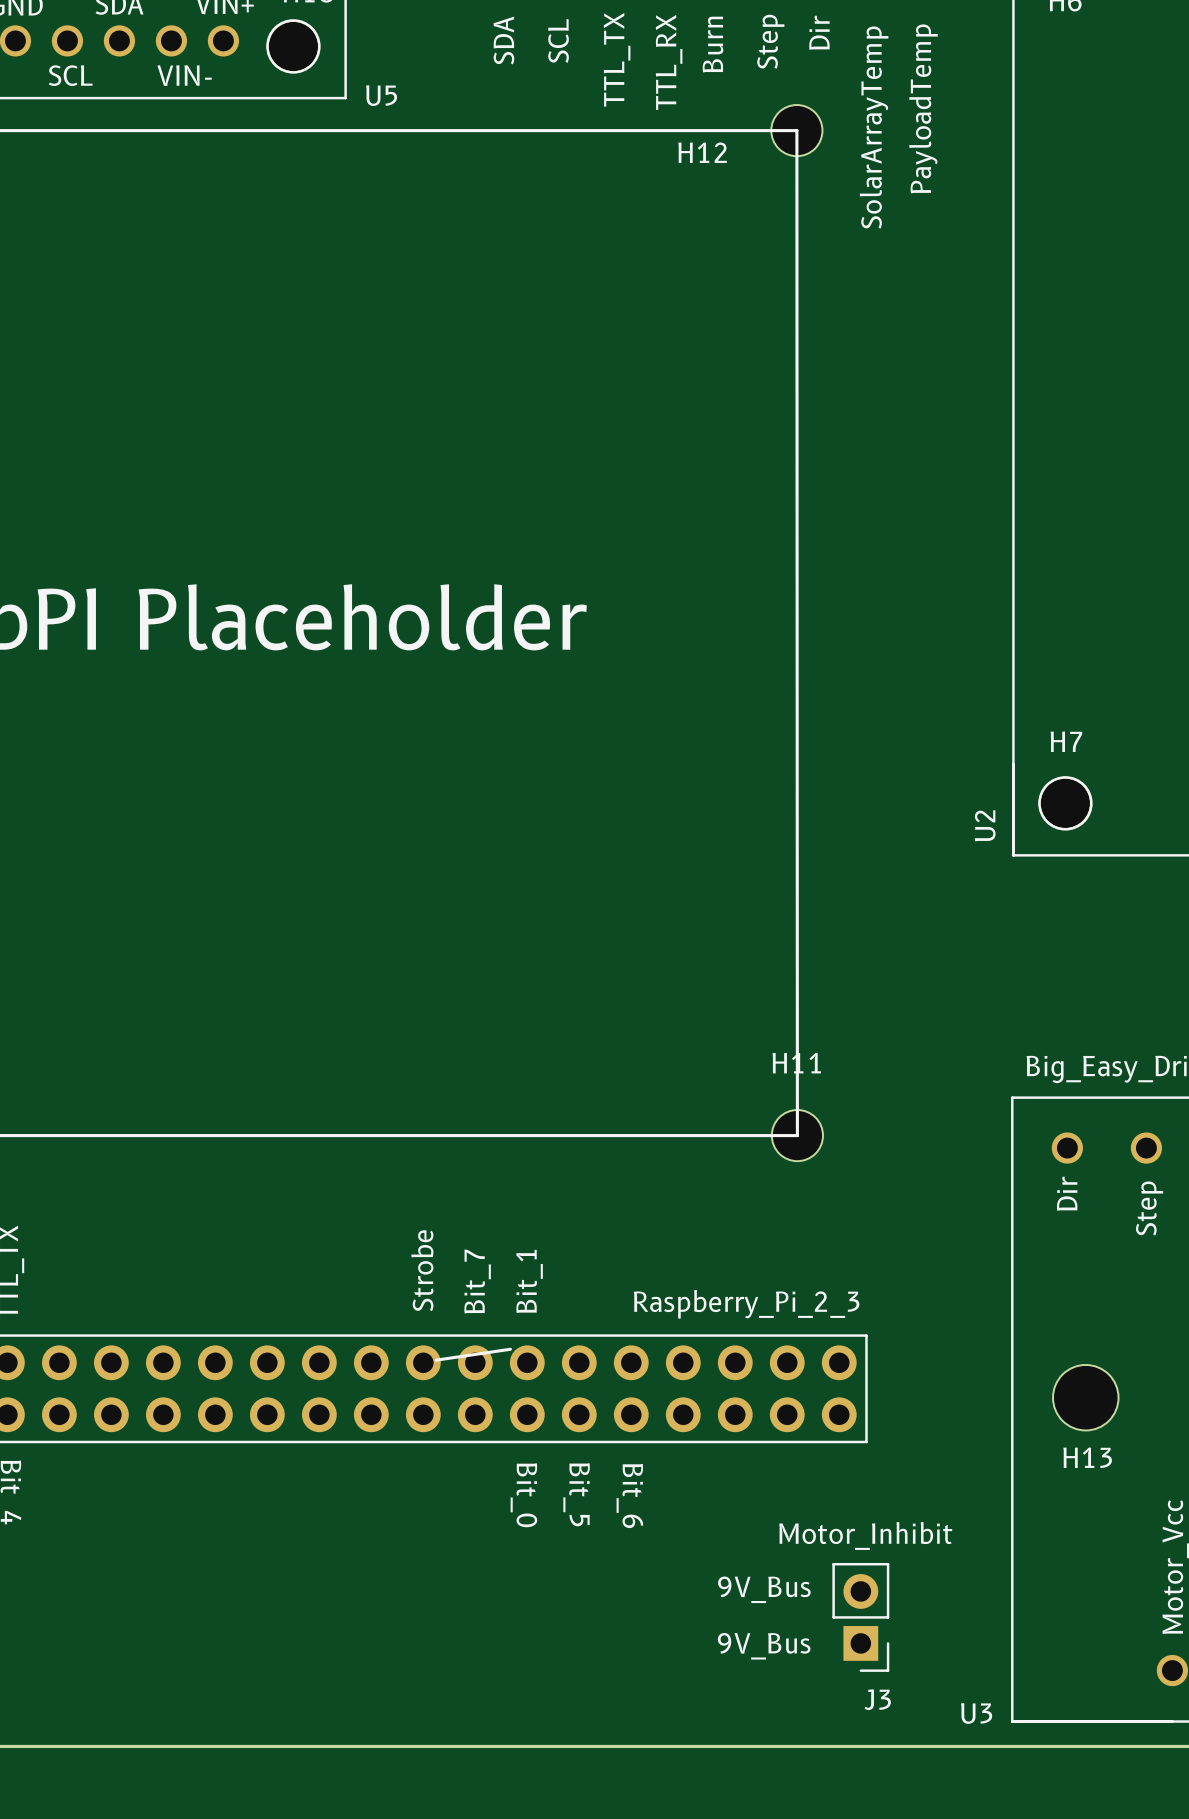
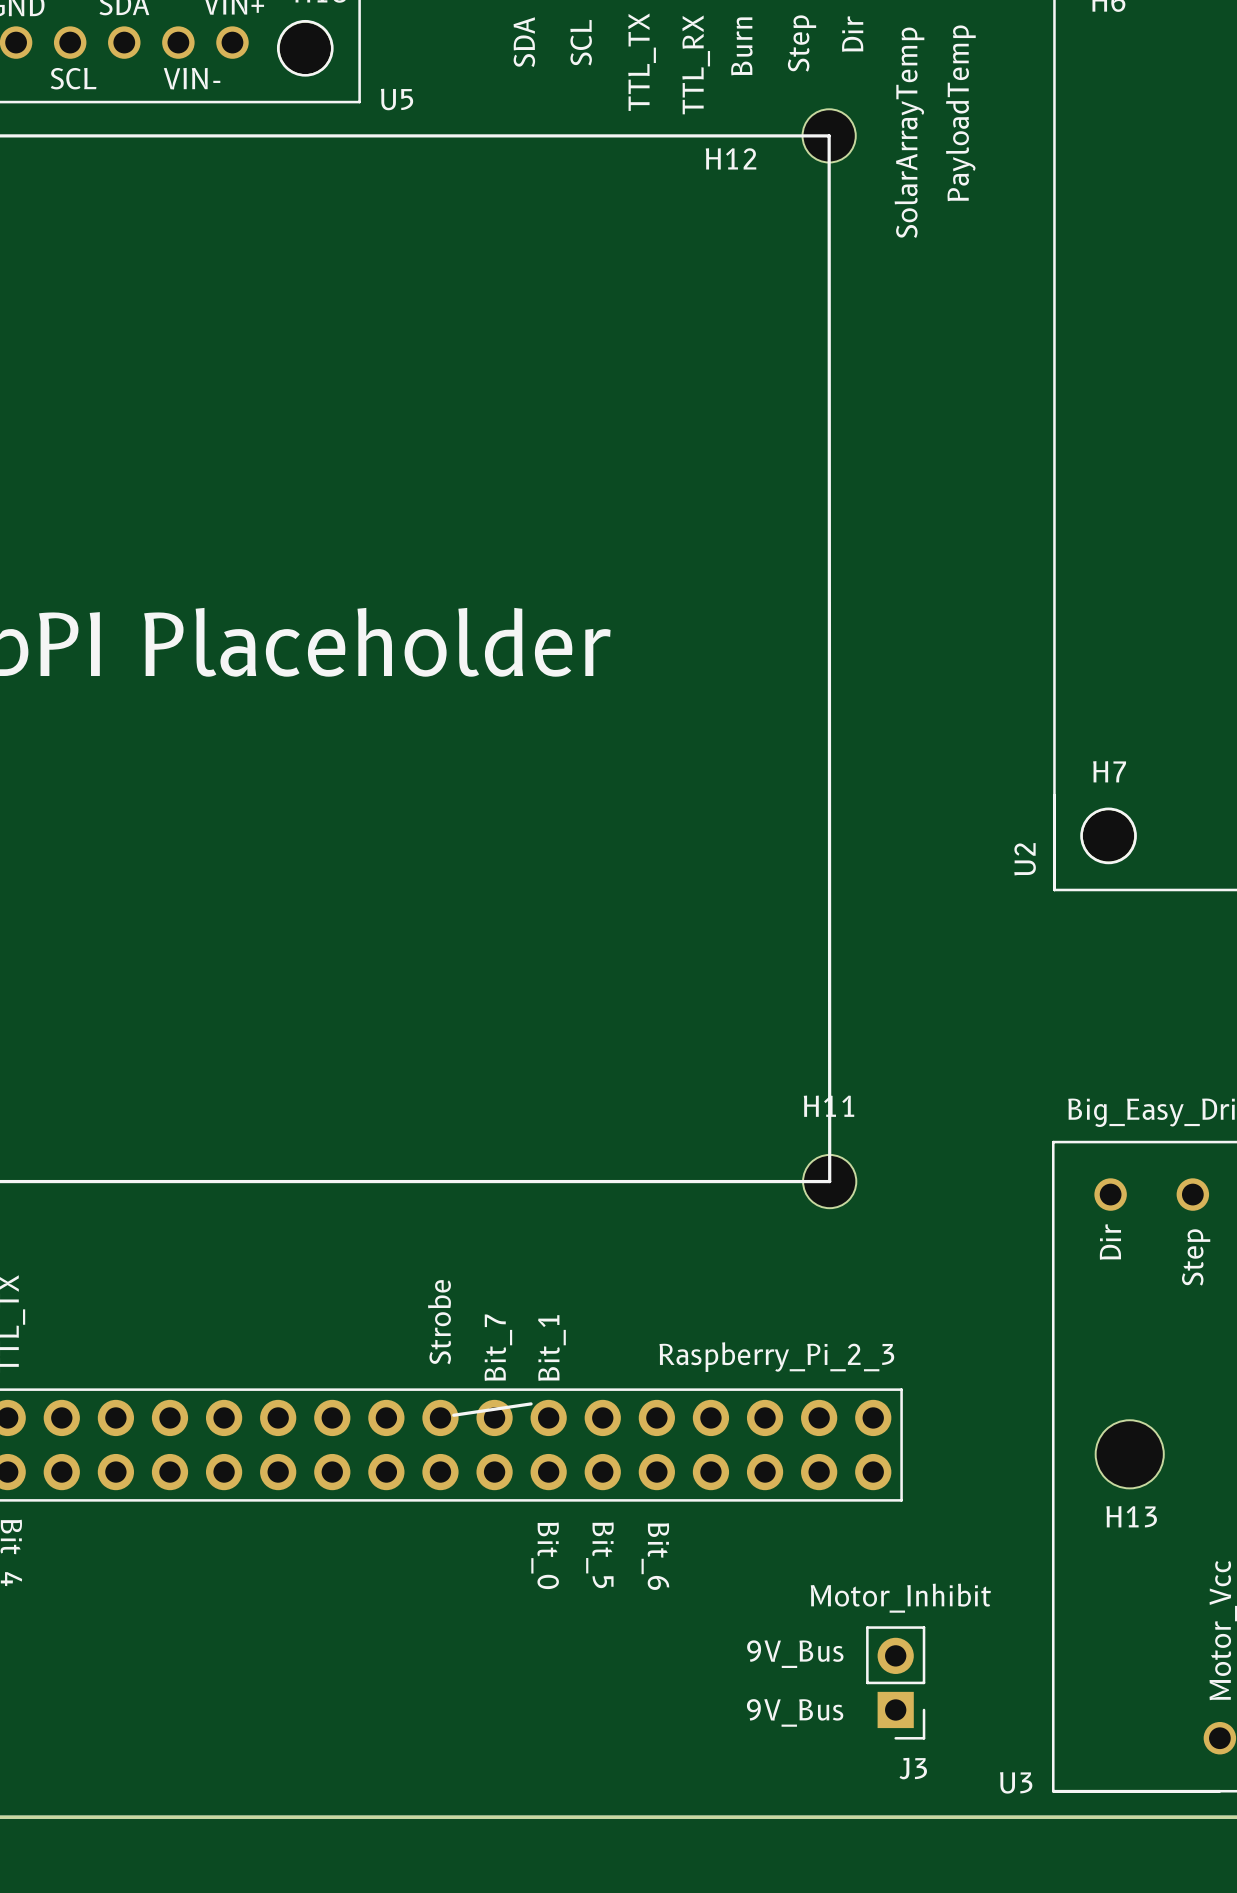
text position: Bit_7 (477, 1281) -> Bit_7 (498, 1347)
text position: Bit_1 (529, 1281) -> Bit_1 (551, 1348)

